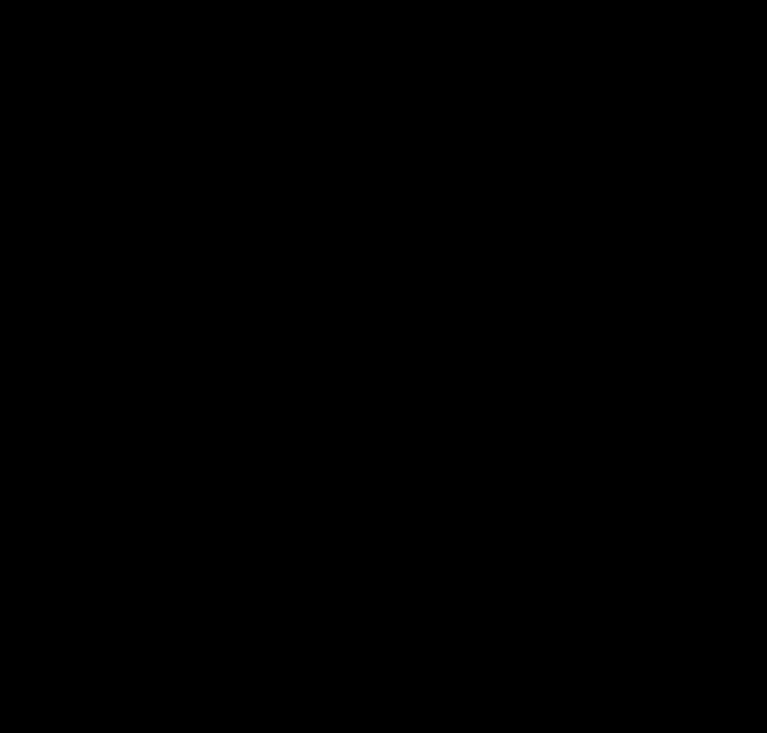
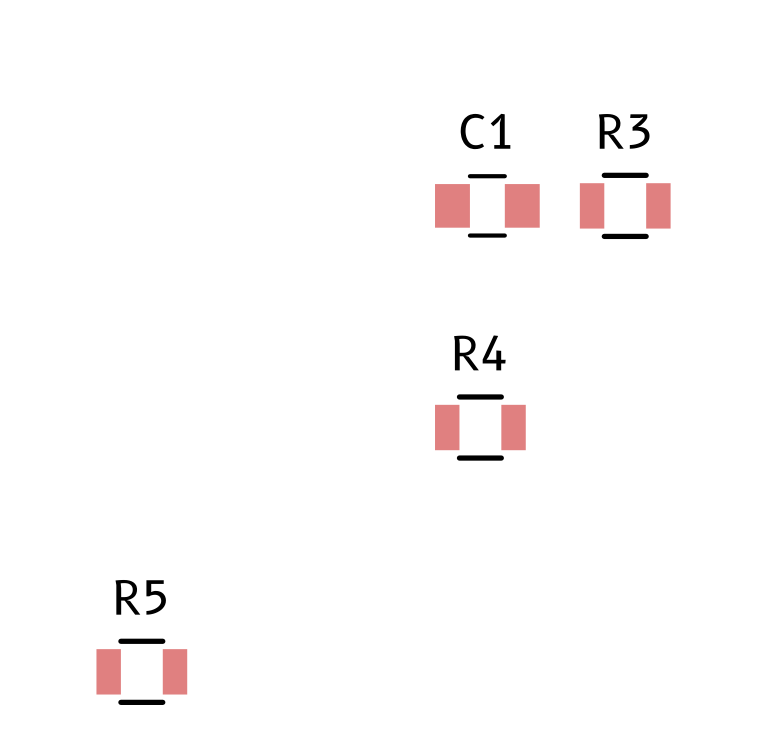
C1: none -> (487, 205)
R3: none -> (625, 205)
R4: none -> (480, 427)
R5: none -> (141, 671)

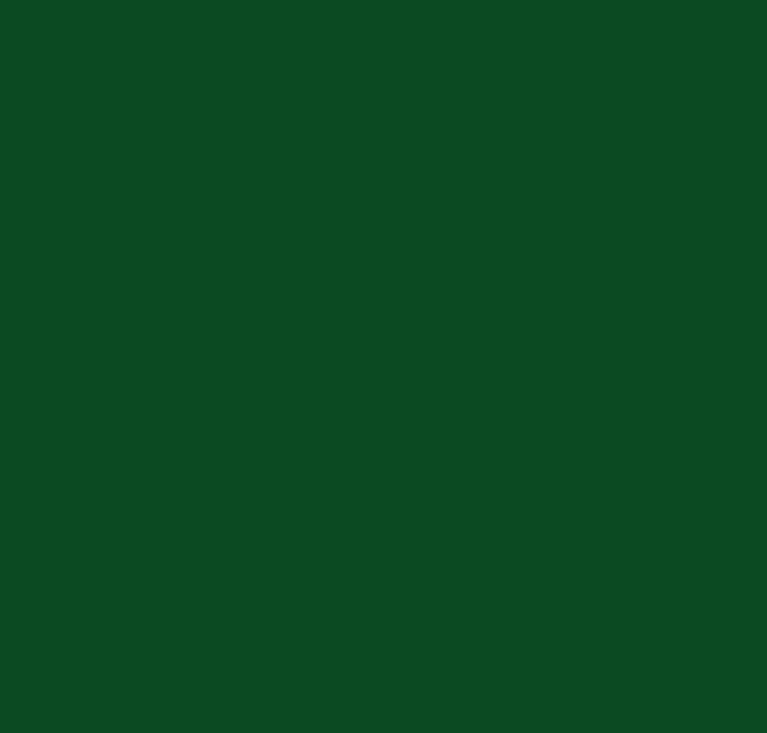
C1: (487, 205) -> none
R3: (625, 205) -> none
R4: (480, 427) -> none
R5: (141, 671) -> none

